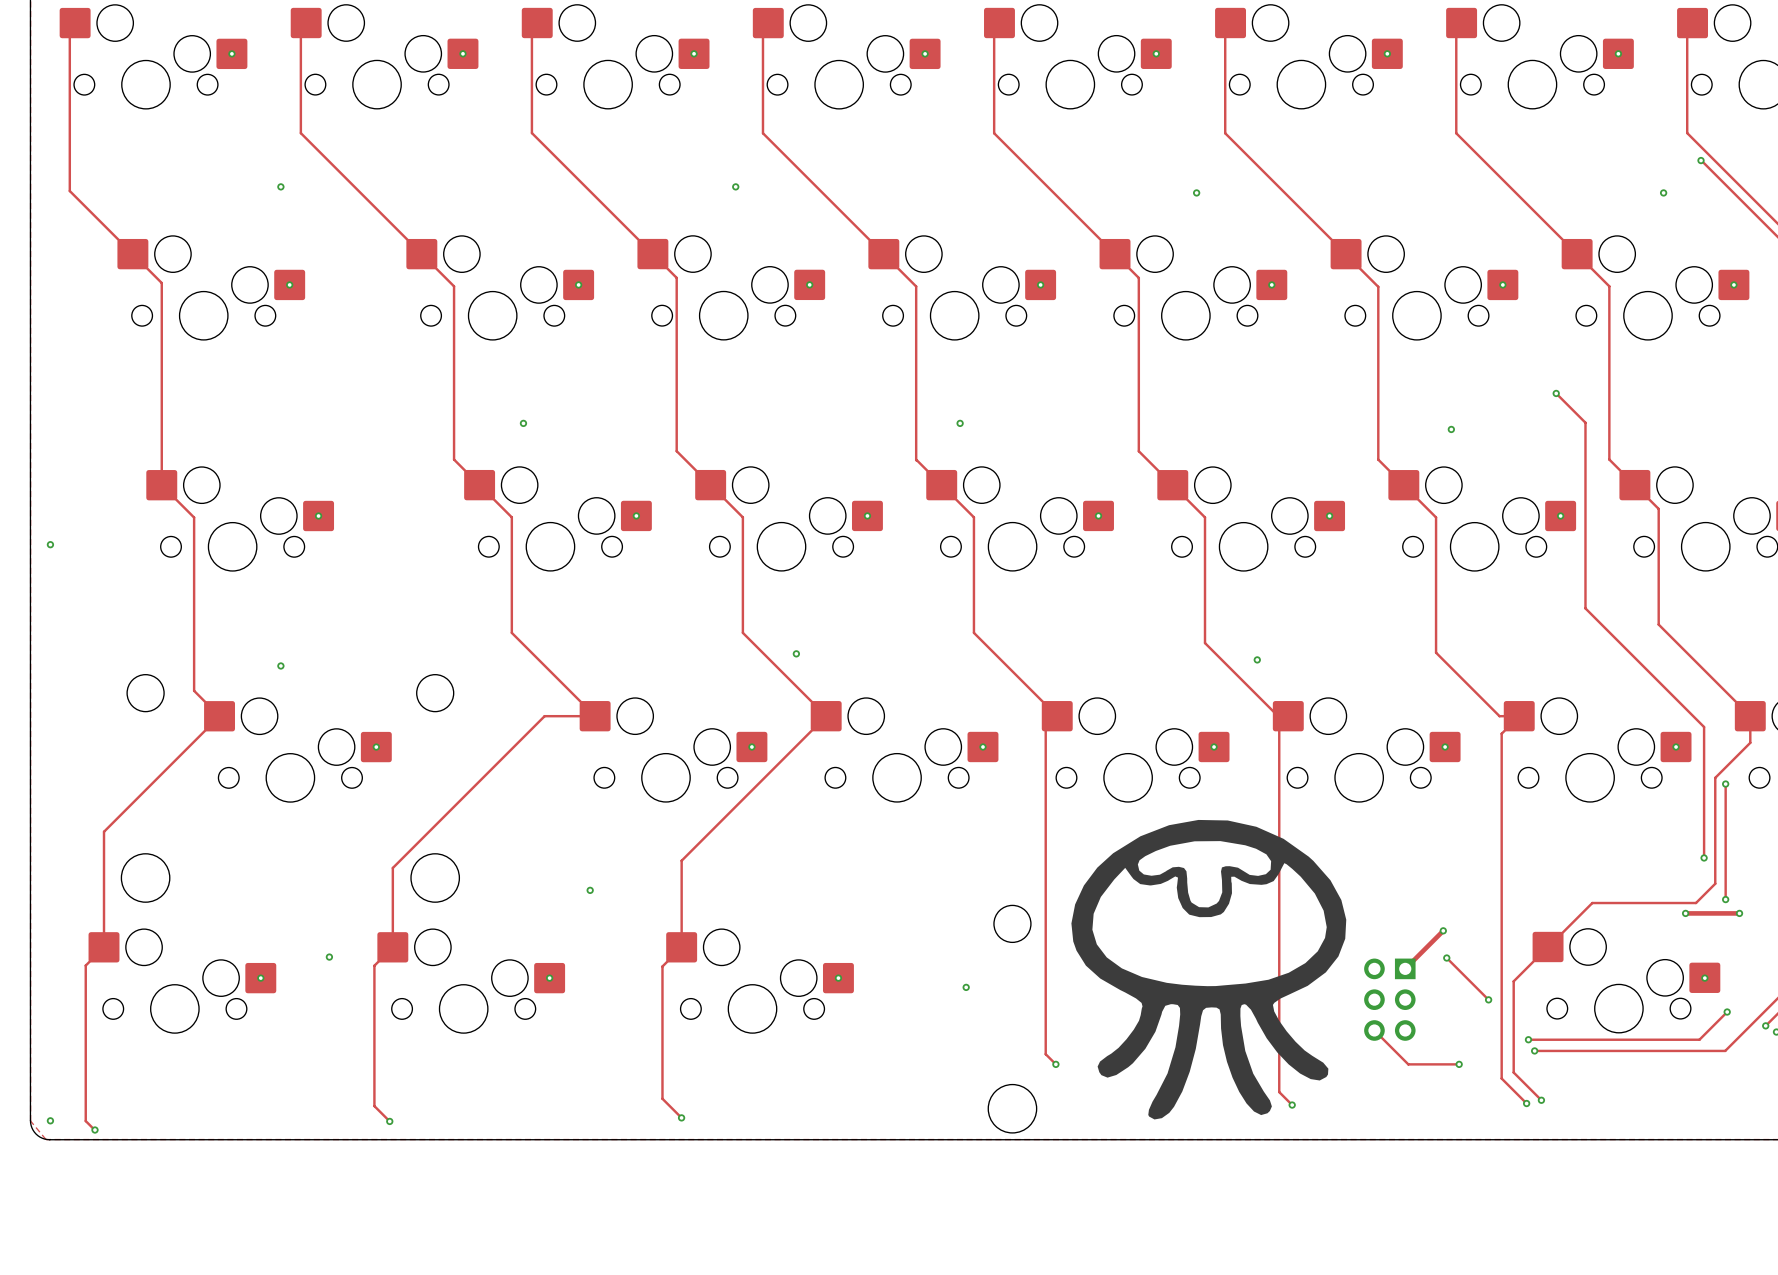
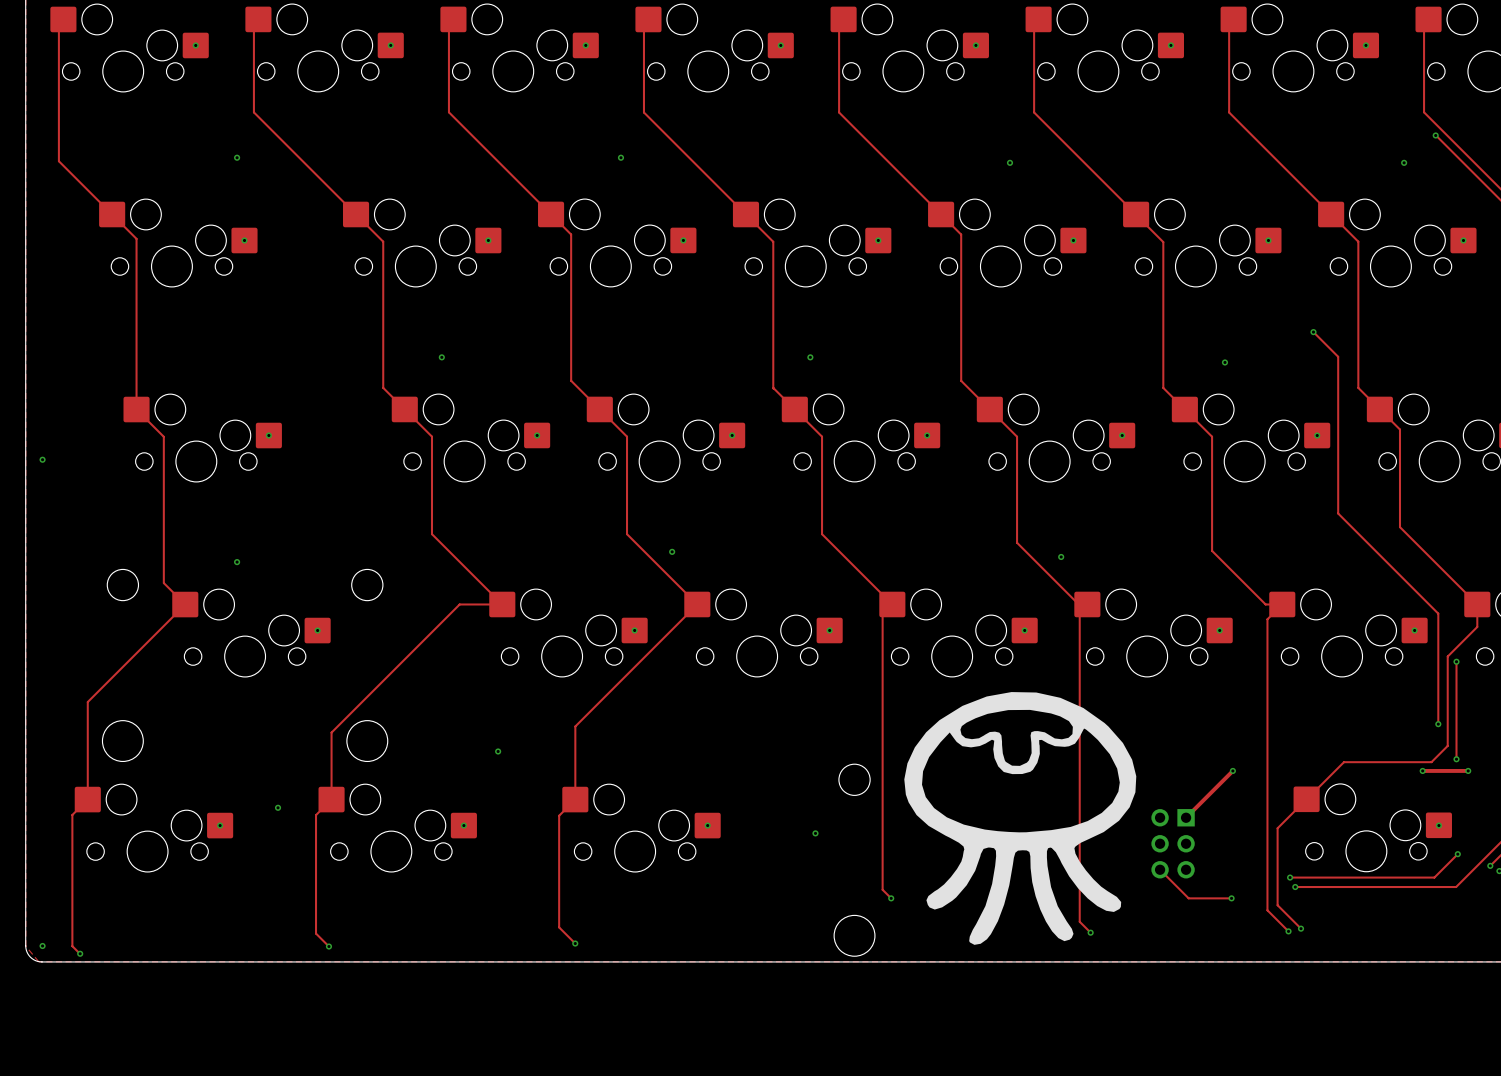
track: none -> (1232, 770) (1218, 785)
via: none -> (1232, 770)
via: (1443, 930) -> none
track: (1446, 958) (1488, 999) -> none
via: (1446, 958) -> none
via: (1488, 999) -> none

